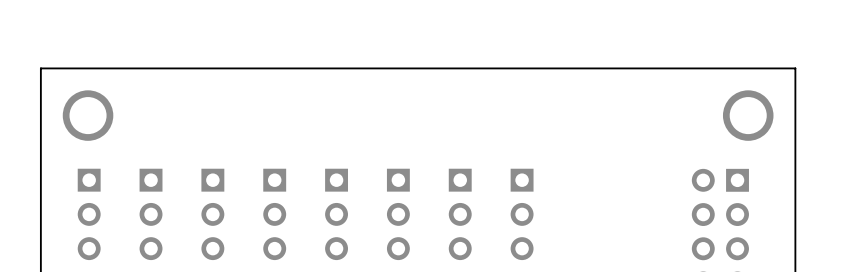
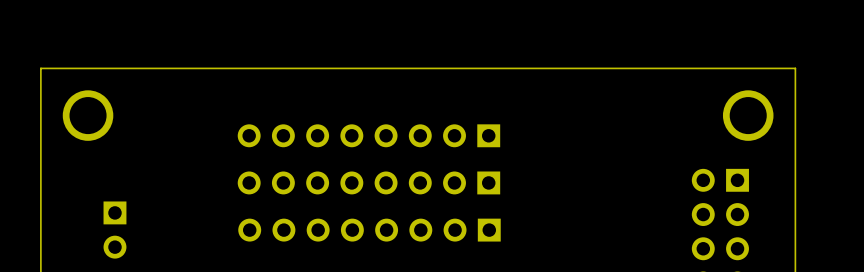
part: none -> (368, 135)
part: none -> (368, 182)
part: (89, 214) -> none
part: (151, 214) -> none
part: (212, 214) -> none
part: (274, 214) -> none
part: (336, 214) -> none
part: (398, 214) -> none
part: (460, 214) -> none
part: (522, 214) -> none
part: none -> (114, 230)
part: none -> (369, 230)

